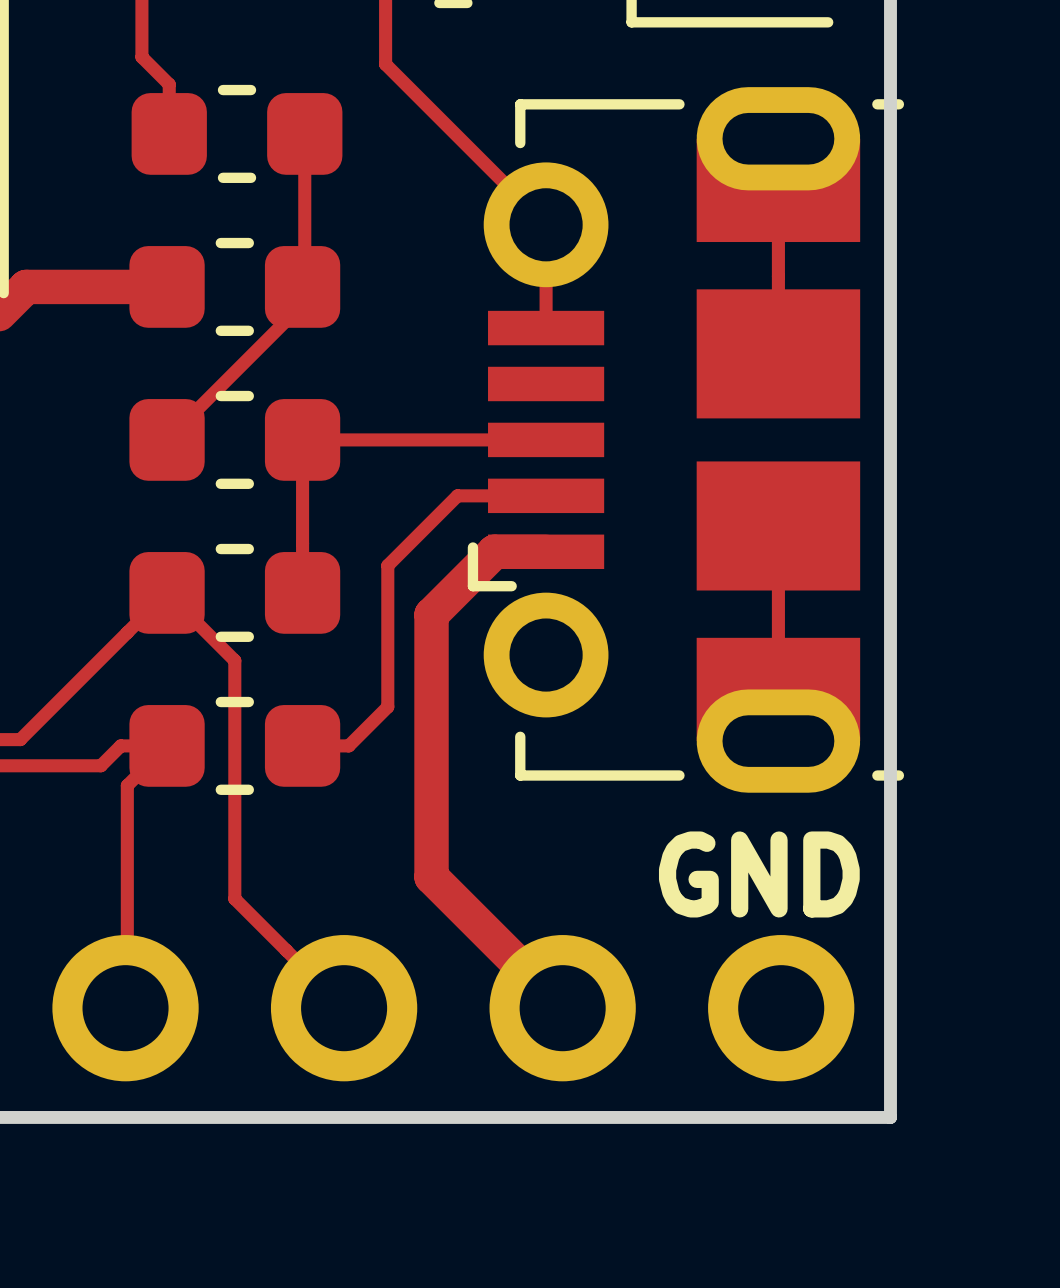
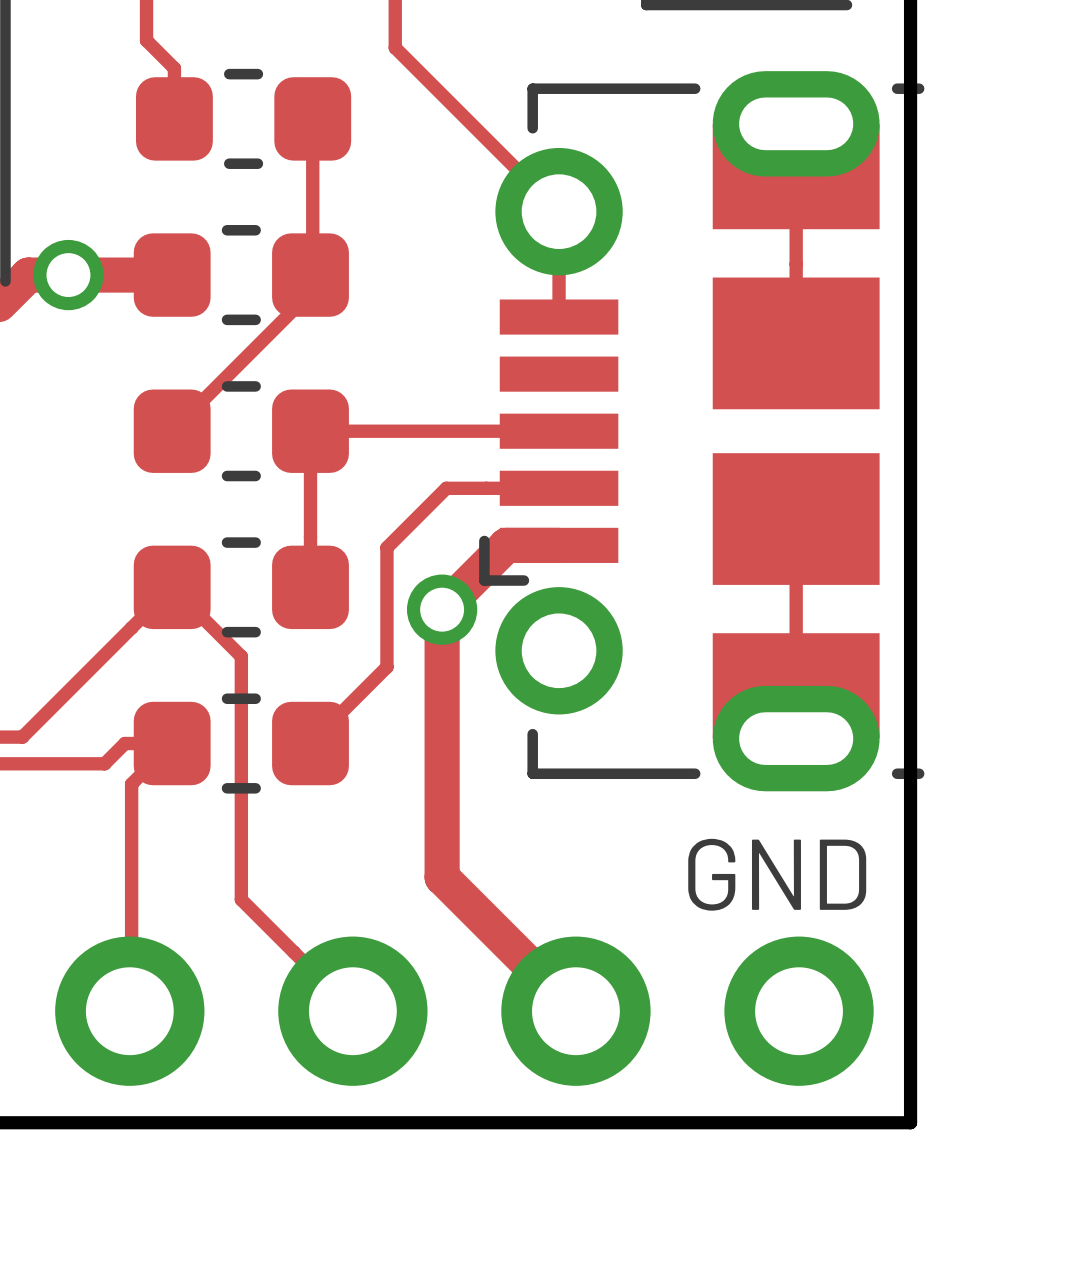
via: none -> (68, 275)
track: (457, 495) (387, 565) (387, 706) (348, 745) (302, 745) -> (468, 488) (446, 488) (386, 547) (386, 667) (310, 743)
via: none -> (442, 609)

